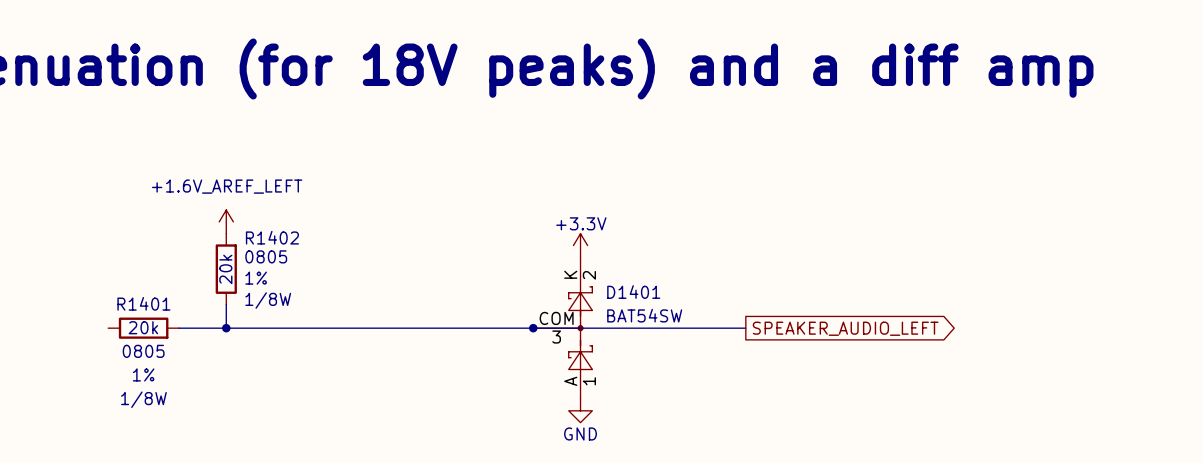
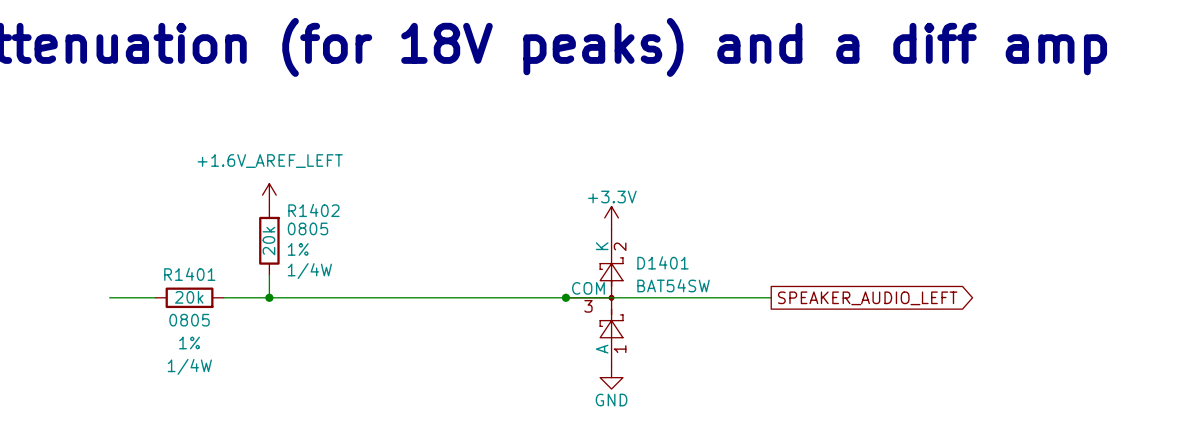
R1402 text: 1/8W (268, 300) -> 1/4W (309, 271)
wire: none -> (109, 297) (155, 297)
R1401 text: 1/8W (143, 399) -> 1/4W (189, 366)

